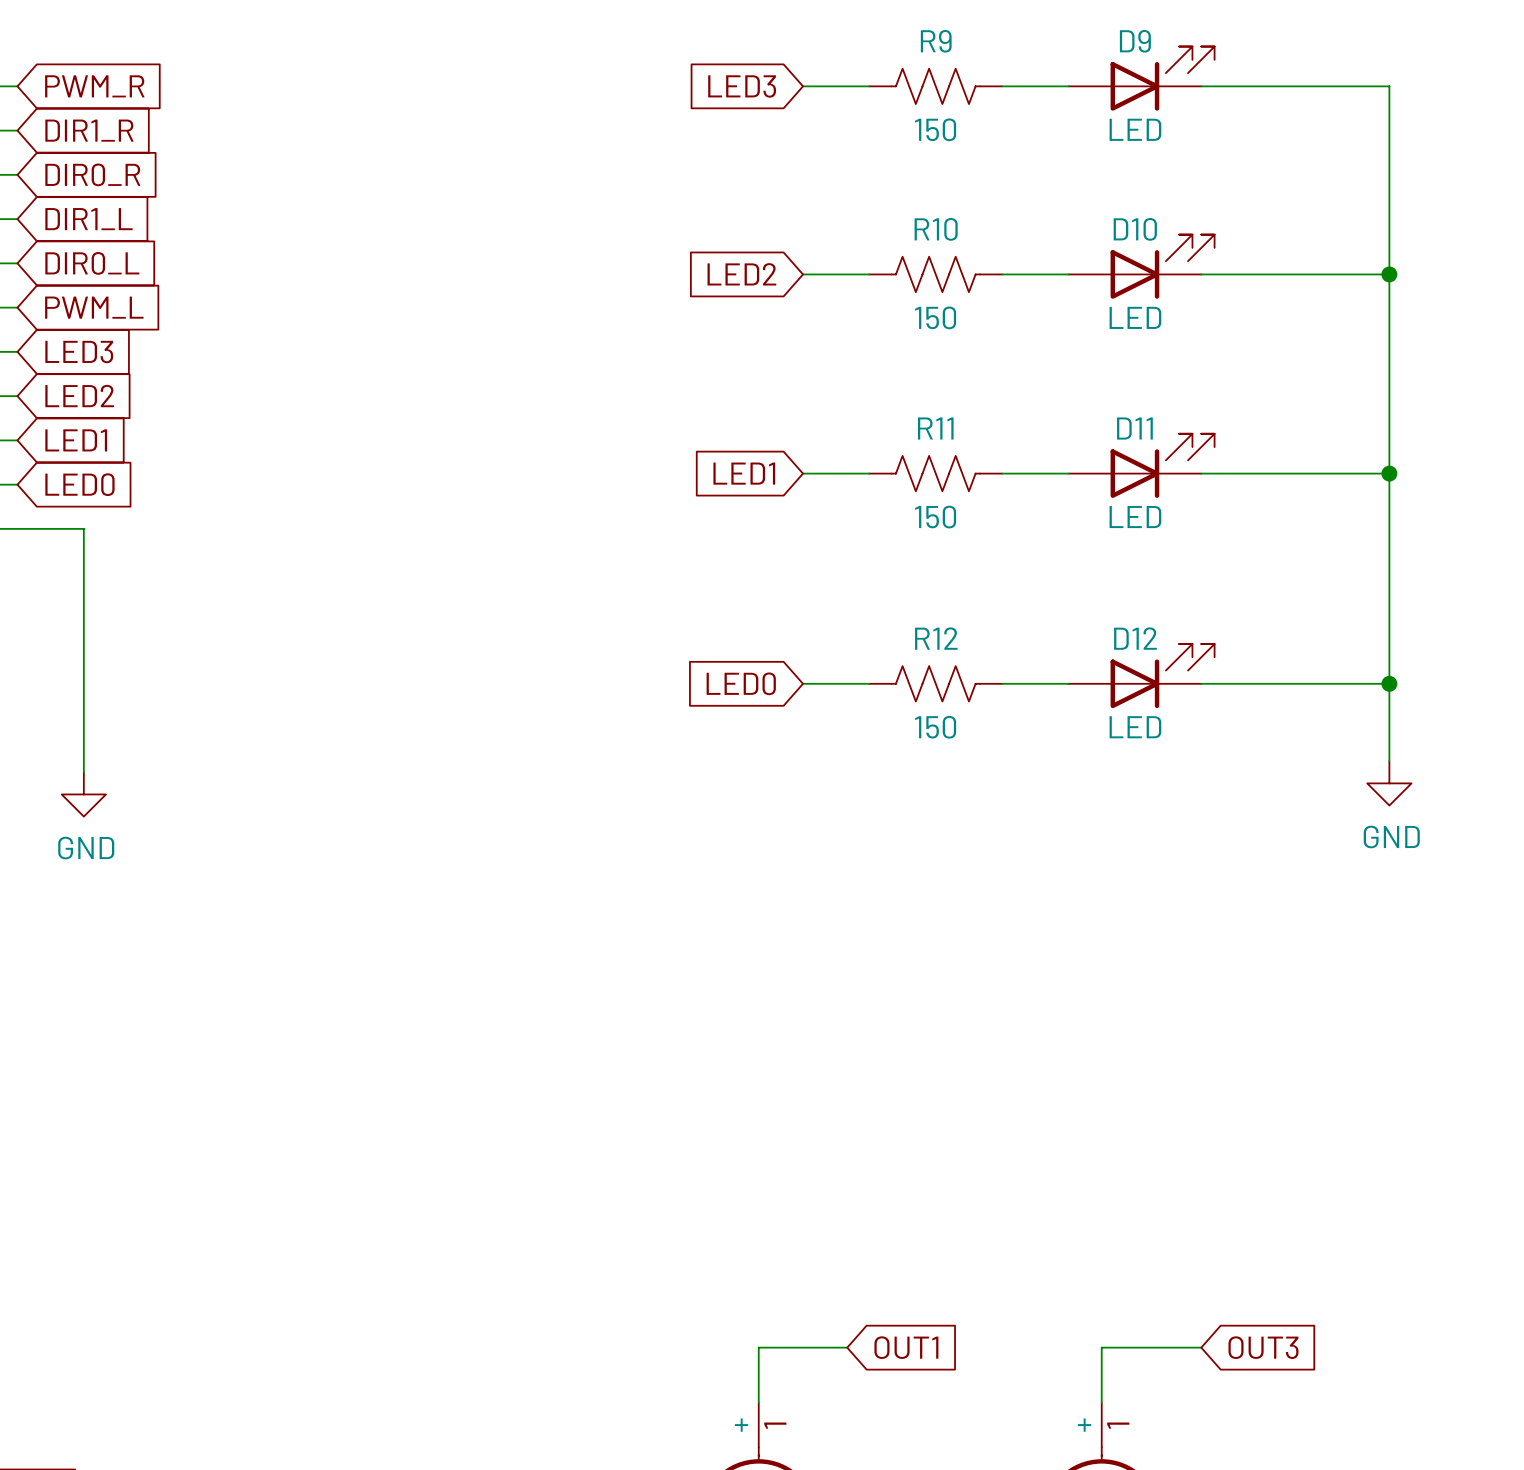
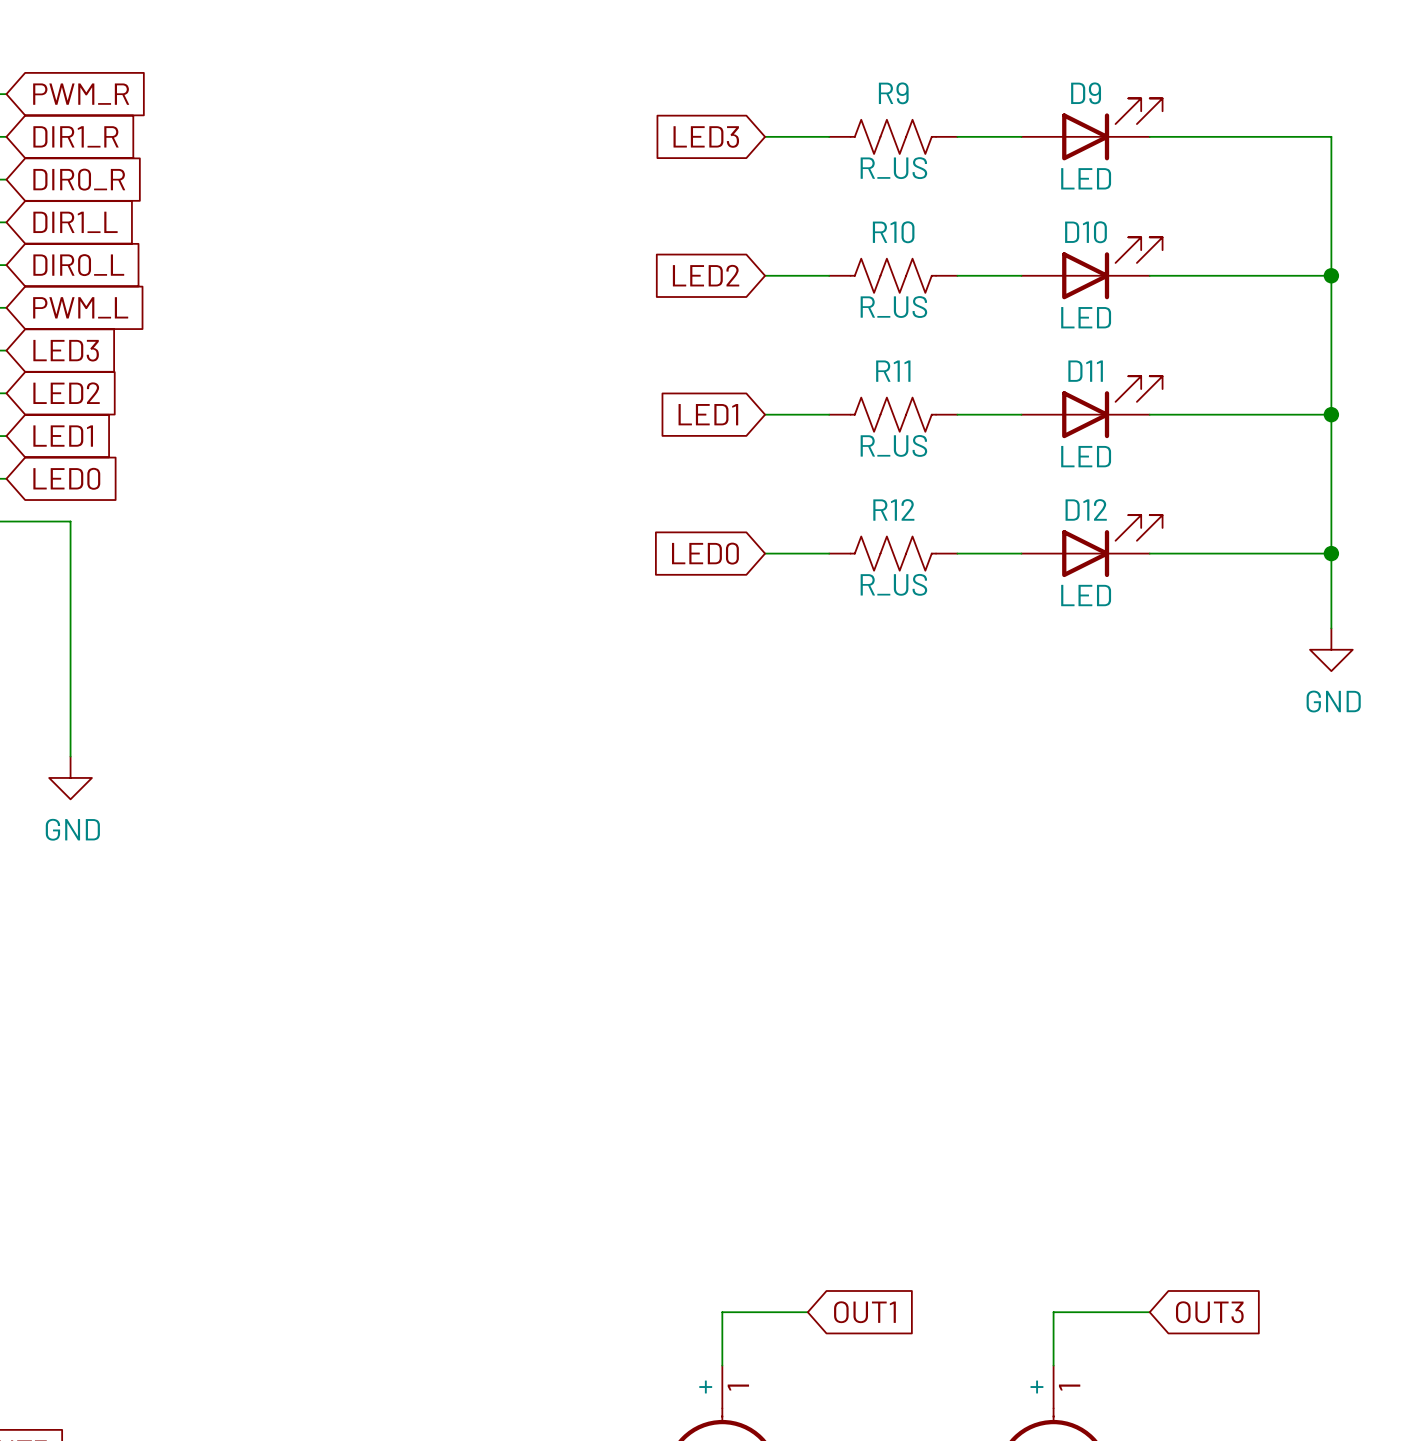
D9 position: (1141, 78) -> (1092, 129)
global label position: LED3 (742, 86) -> LED3 (706, 136)
wire: (803, 86) (869, 86) -> (765, 136) (829, 136)
R9 position: (935, 86) -> (893, 136)
wire: (1002, 86) (1068, 86) -> (957, 136) (1021, 136)
wire: (1201, 86) (1389, 86) (1389, 130) -> (1149, 136) (1331, 136)
R9 value: 150 (935, 129) -> R_US (893, 168)
R10 value: 150 (935, 317) -> R_US (893, 307)
junction: none -> (1331, 414)
D11 position: (1141, 465) -> (1092, 407)
global label position: LED1 (744, 473) -> LED1 (708, 414)
wire: (803, 473) (869, 473) -> (765, 414) (829, 414)
R11 position: (935, 473) -> (893, 414)
wire: (1002, 473) (1068, 473) -> (957, 414) (1021, 414)
wire: (1201, 473) (1389, 473) -> (1149, 414) (1331, 414)
junction: (1389, 473) -> none
R11 value: 150 (935, 517) -> R_US (893, 445)
junction: none -> (1331, 553)
wire: (1389, 639) (1389, 761) -> none
D12 position: (1141, 676) -> (1092, 546)
global label position: LED0 (741, 683) -> LED0 (705, 553)
wire: (803, 683) (869, 683) -> (765, 553) (829, 553)
R12 position: (935, 683) -> (893, 553)
wire: (1002, 683) (1068, 683) -> (957, 553) (1021, 553)
wire: (1201, 683) (1389, 683) -> (1149, 553) (1331, 553)
junction: (1389, 683) -> none
R12 value: 150 (935, 727) -> R_US (893, 584)
power symbol position: GND (1389, 783) -> GND (1331, 649)

